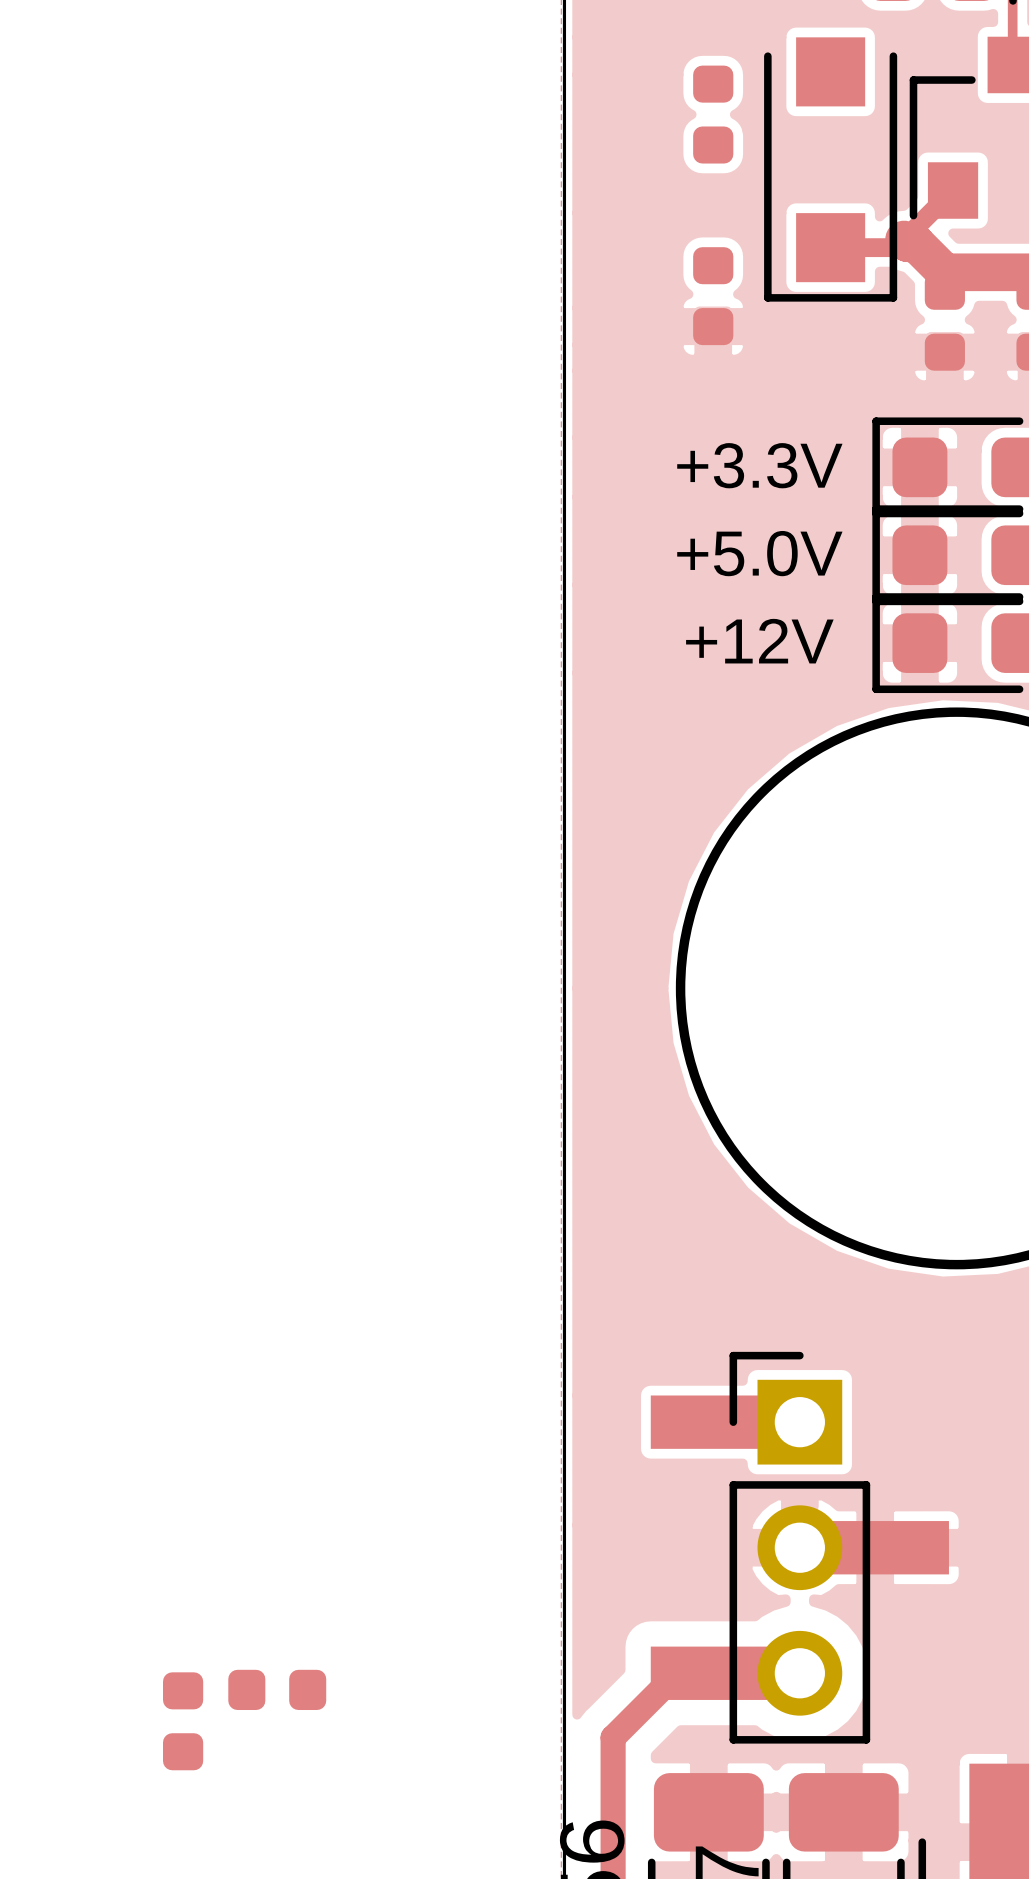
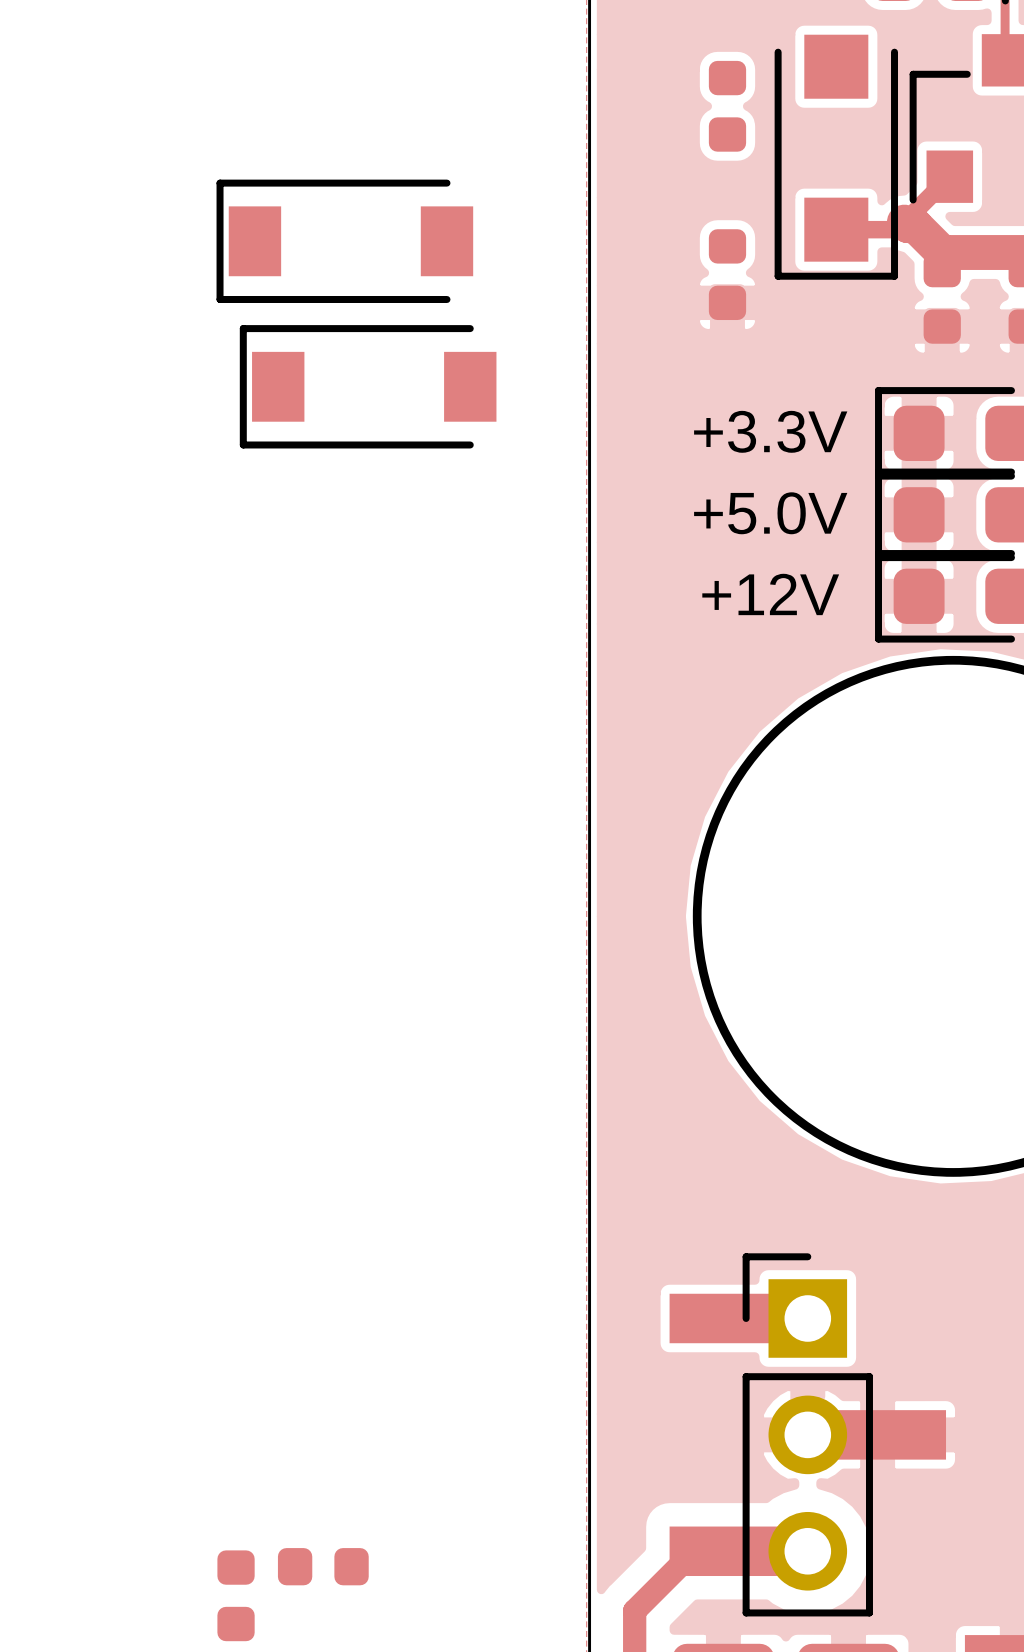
part: none -> (344, 241)
part: none -> (368, 386)

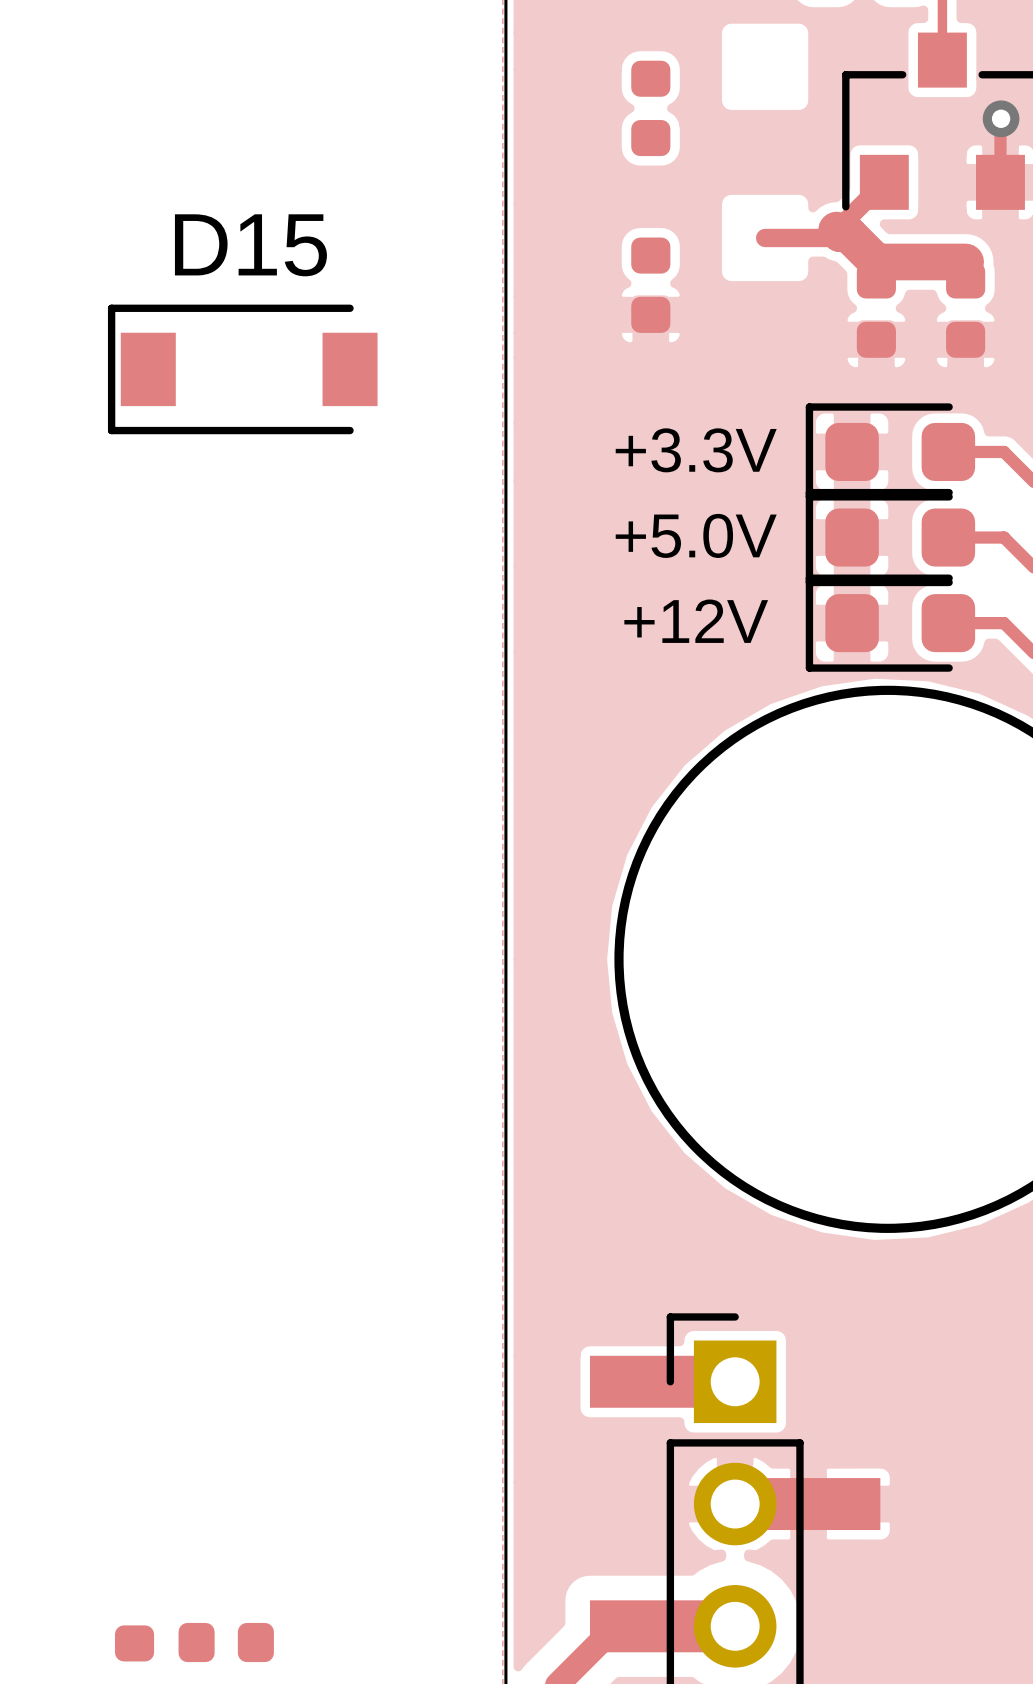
part: (836, 157) -> none
D15 name: none -> D15 (250, 245)
part: (344, 241) -> none
D15 position: (368, 386) -> (242, 369)

